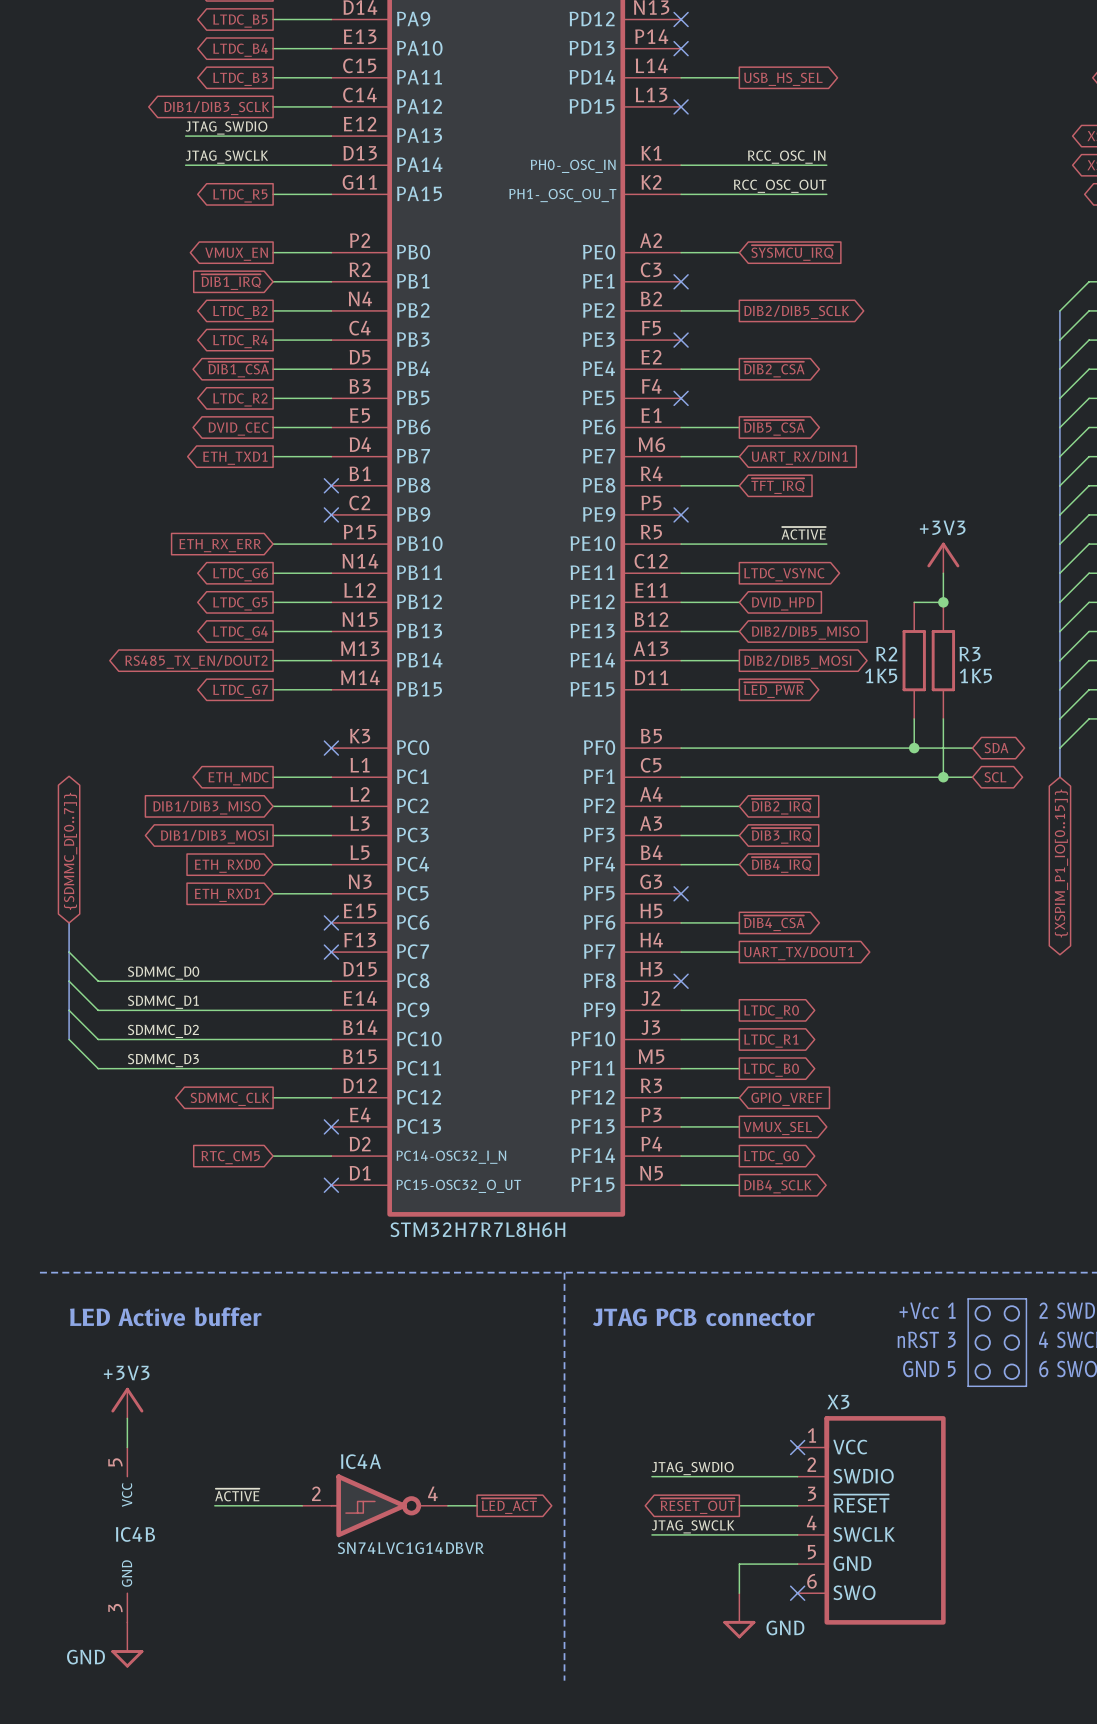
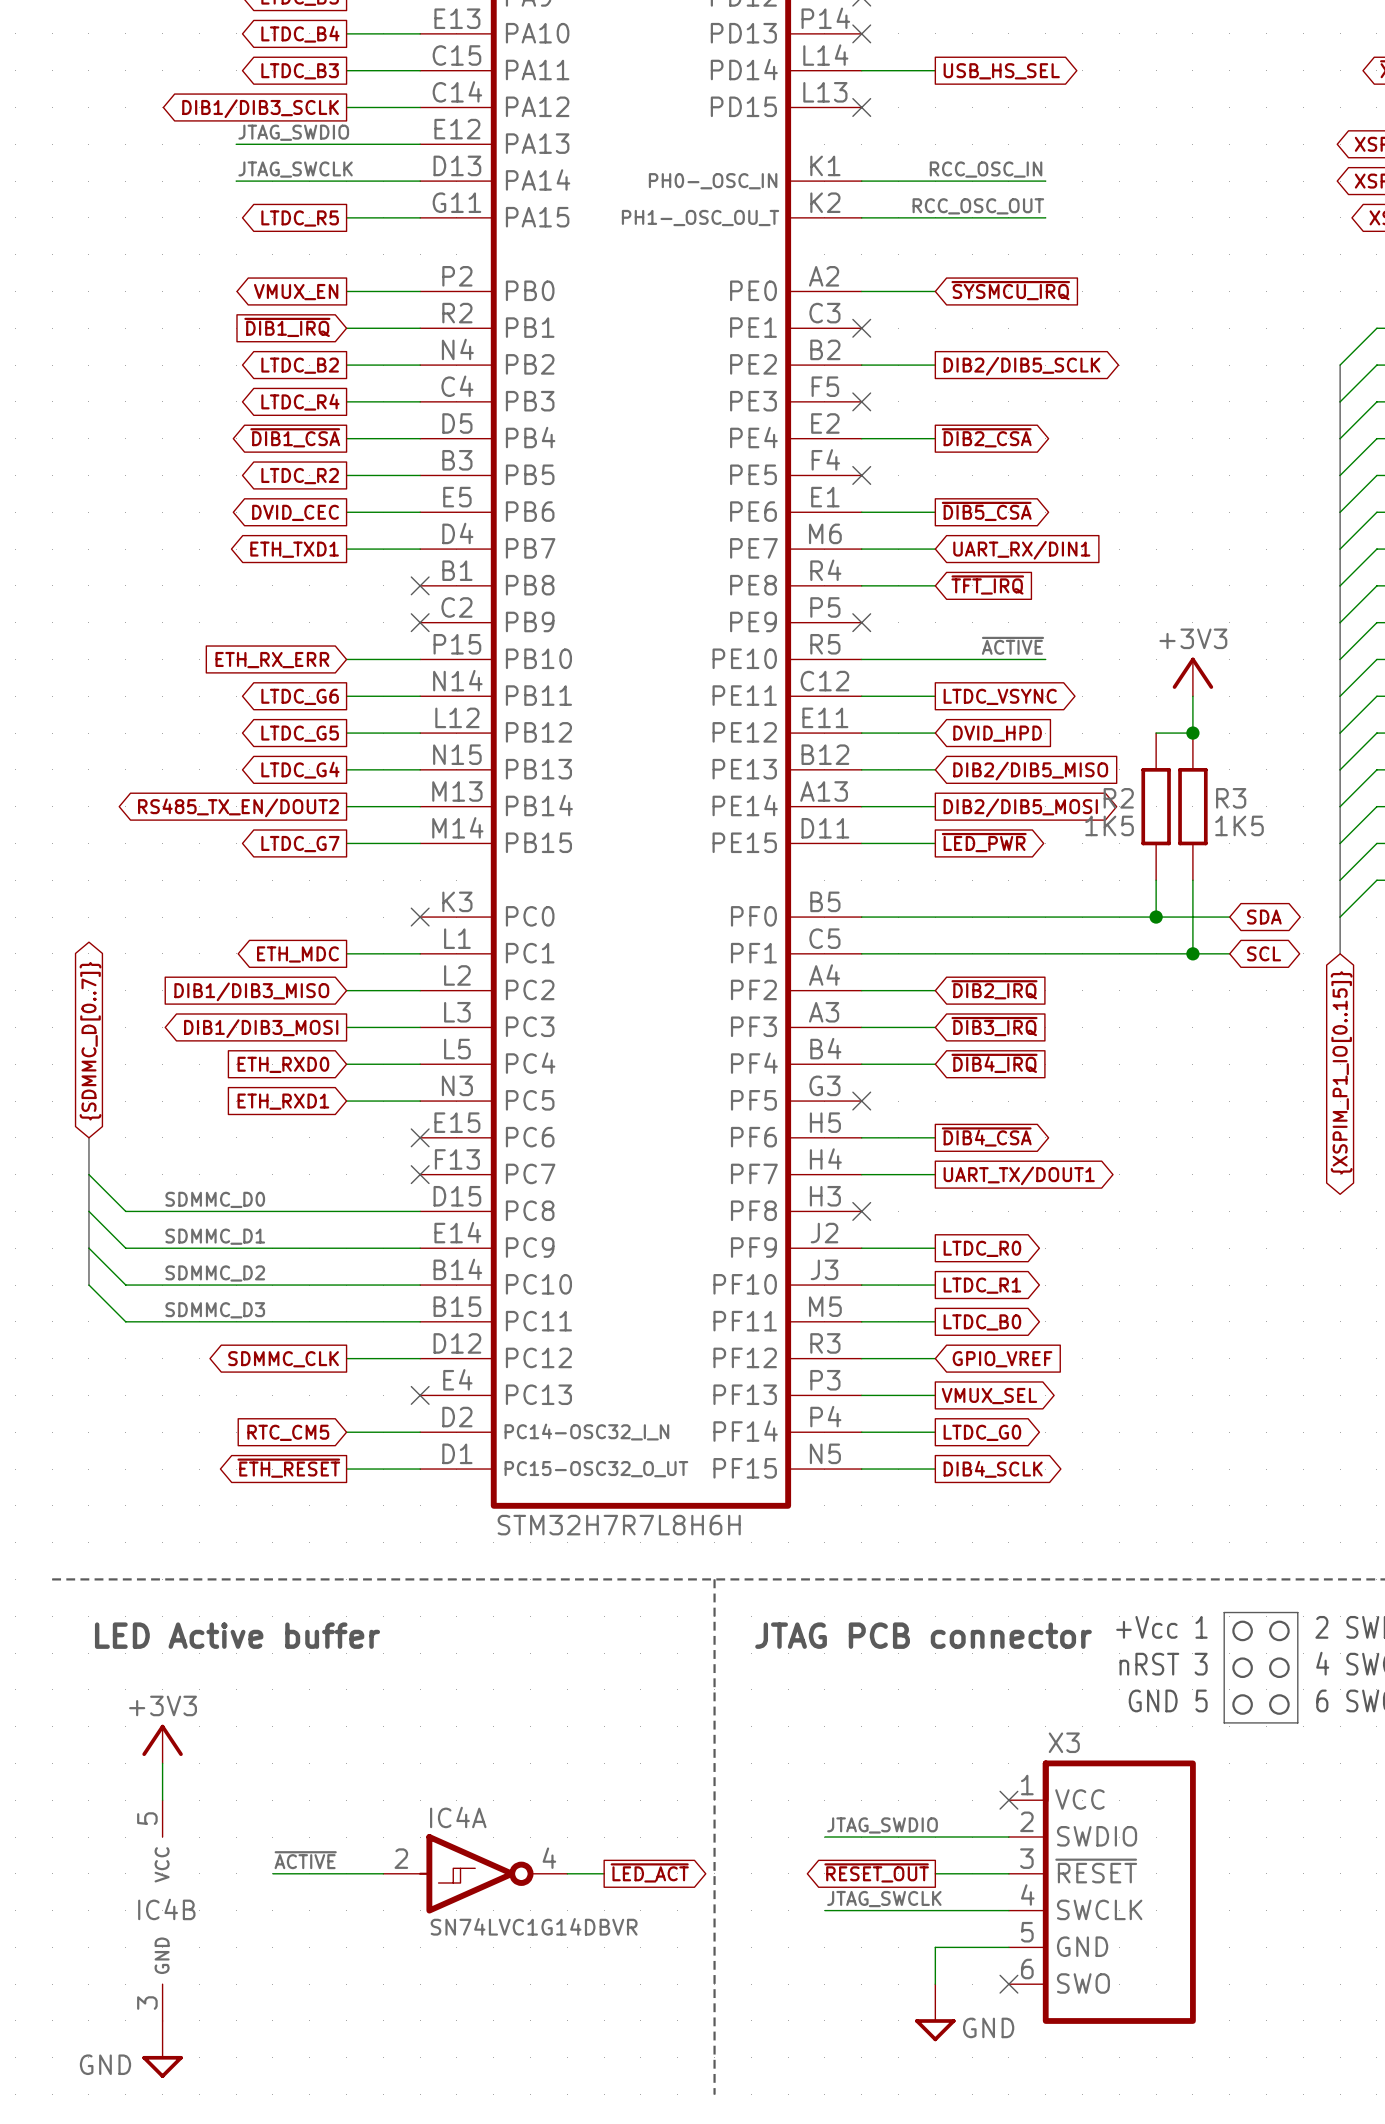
global label: none -> ~{ETH_RESET} (288, 1468)
wire: none -> (346, 1469) (420, 1469)
no-connect mark: (331, 1185) -> none

